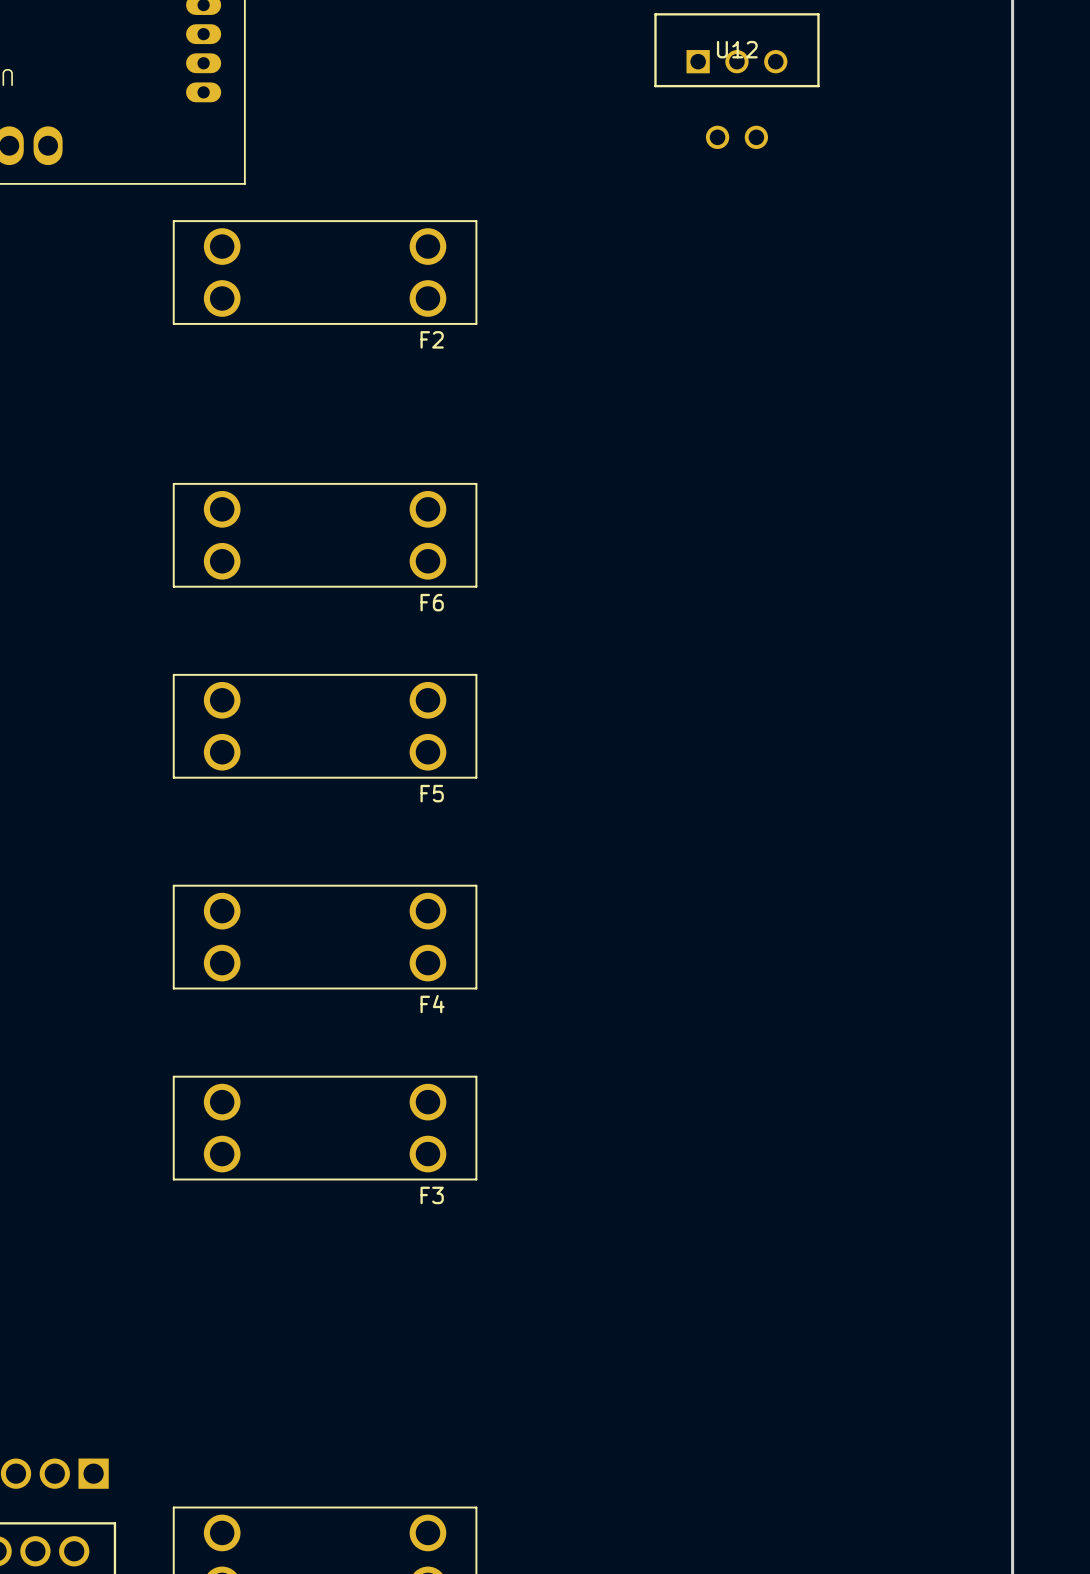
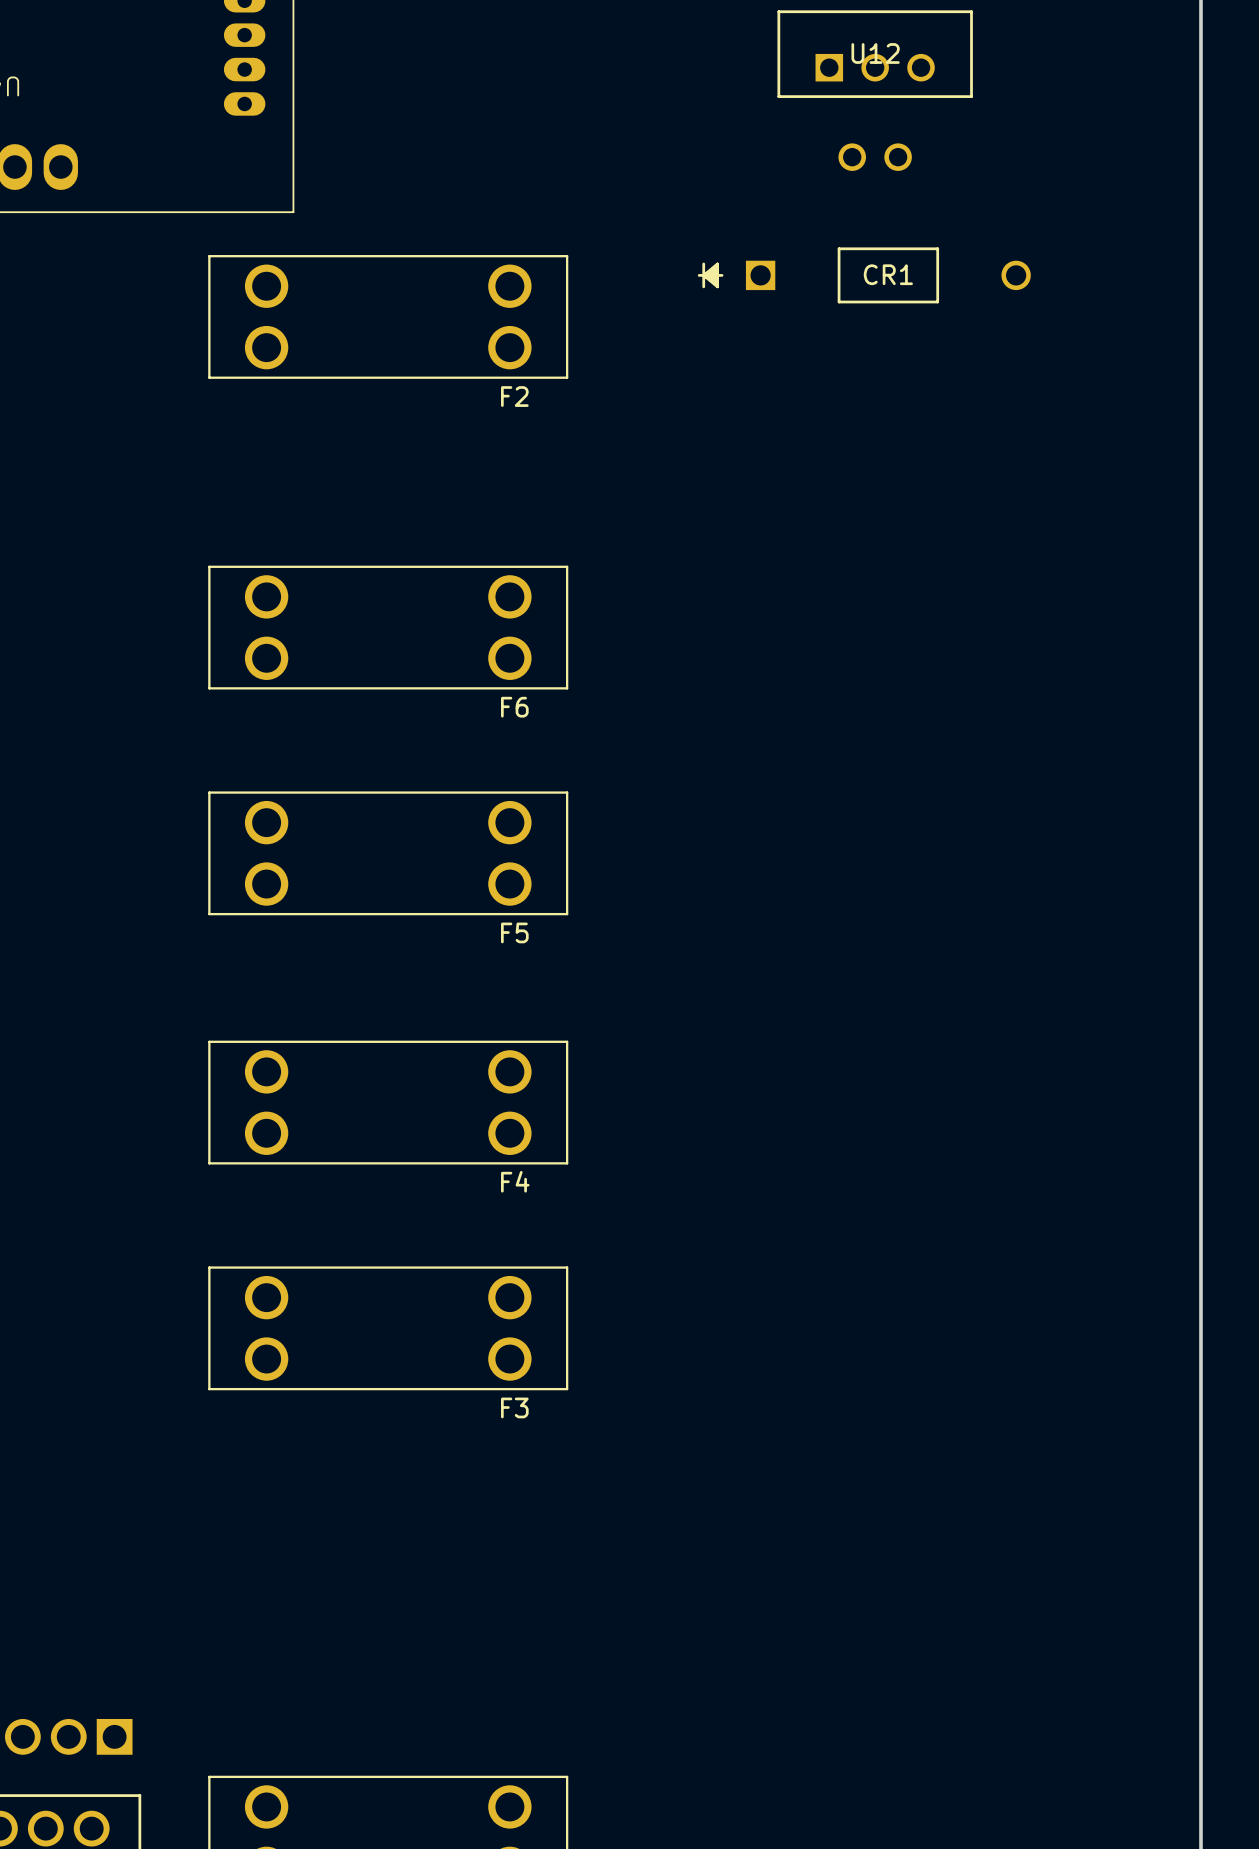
CR1: none -> (864, 275)

